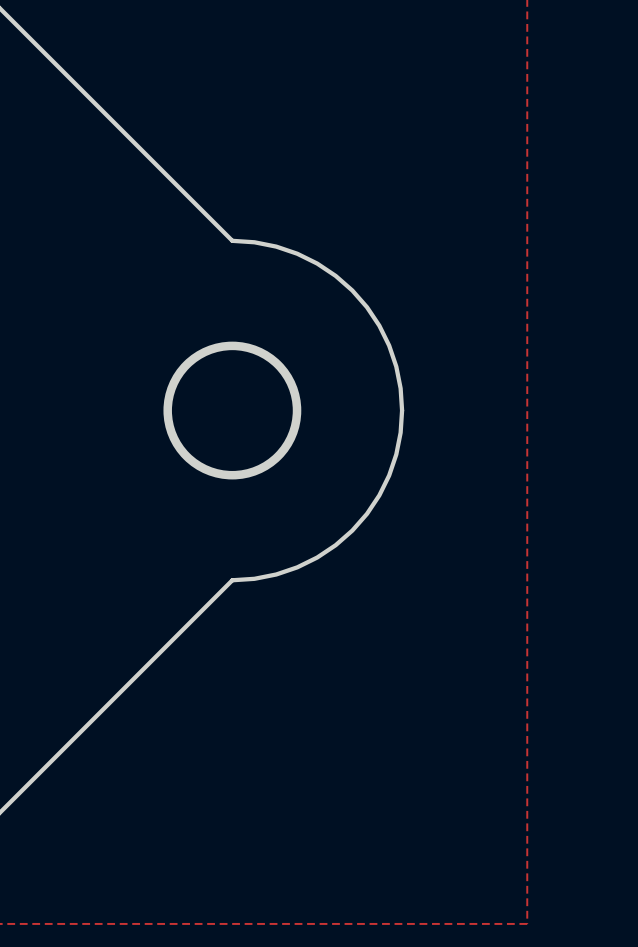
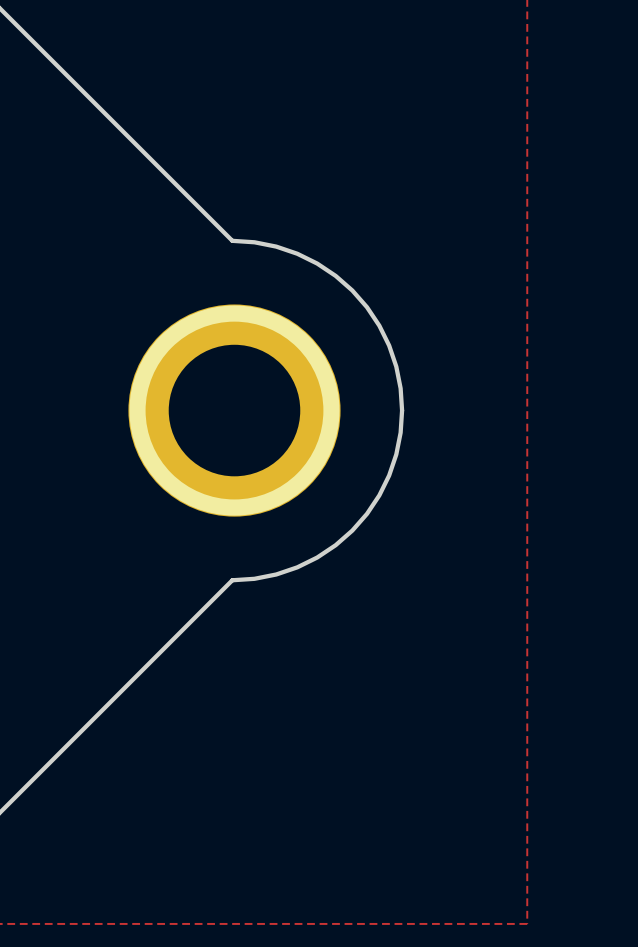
round board edge: [163, 341, 302, 480] -> none
part: none -> (234, 410)

